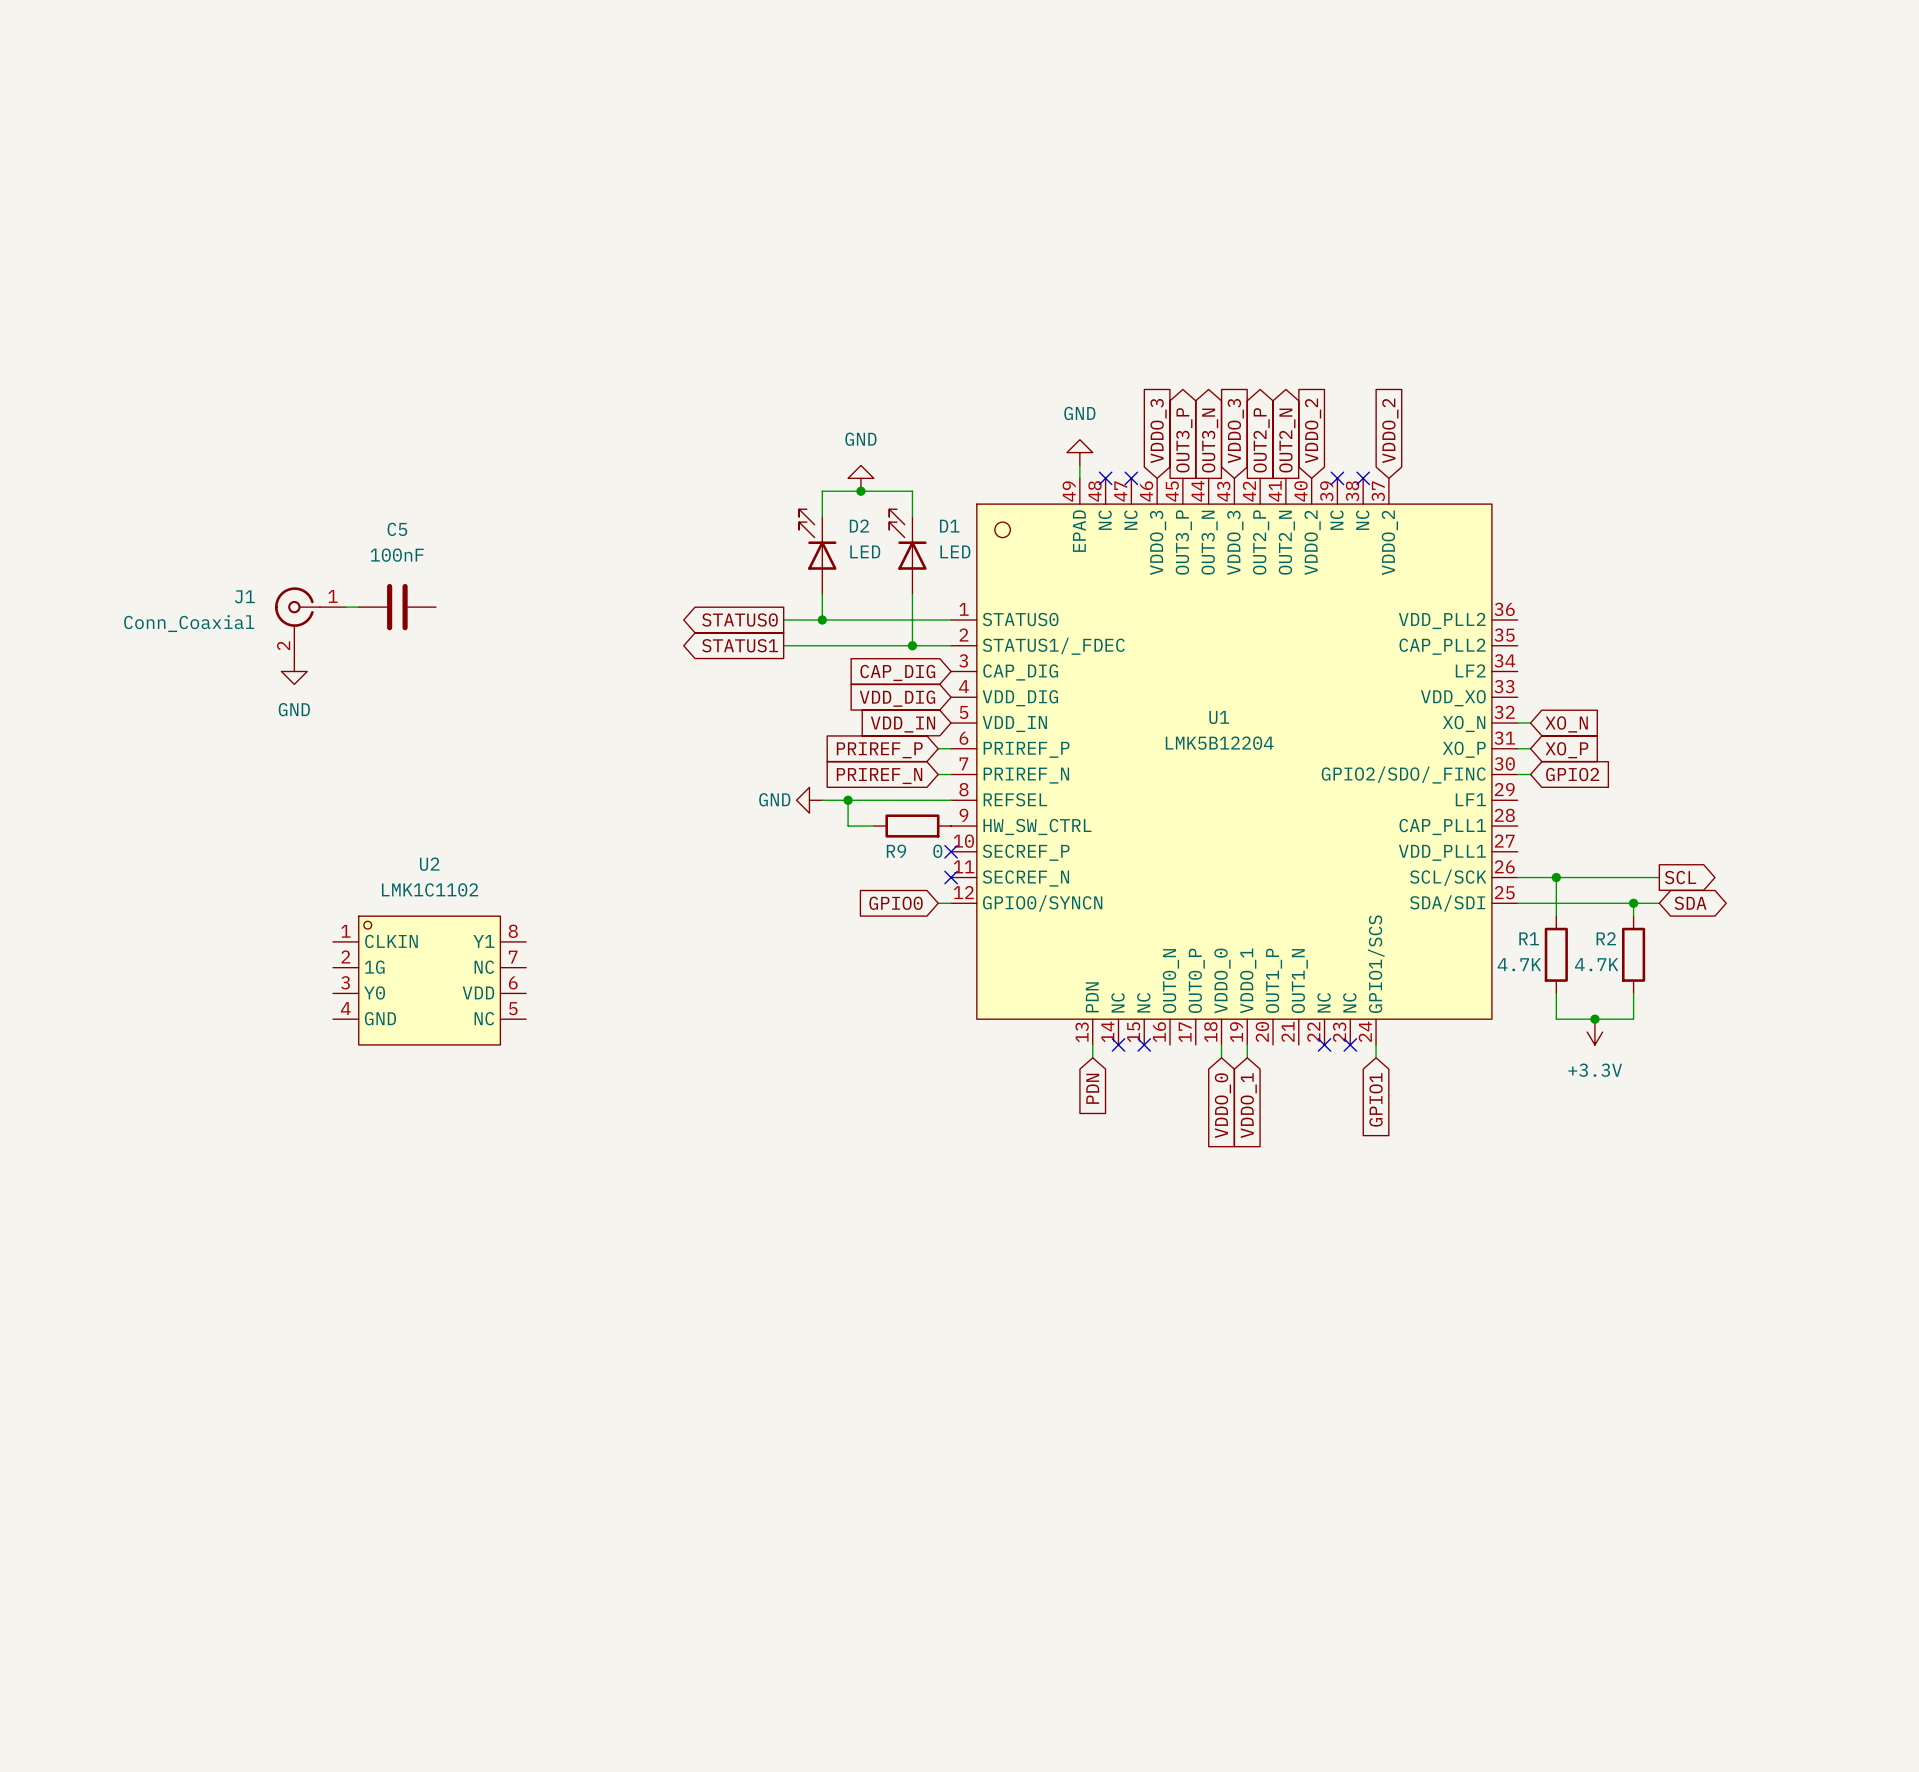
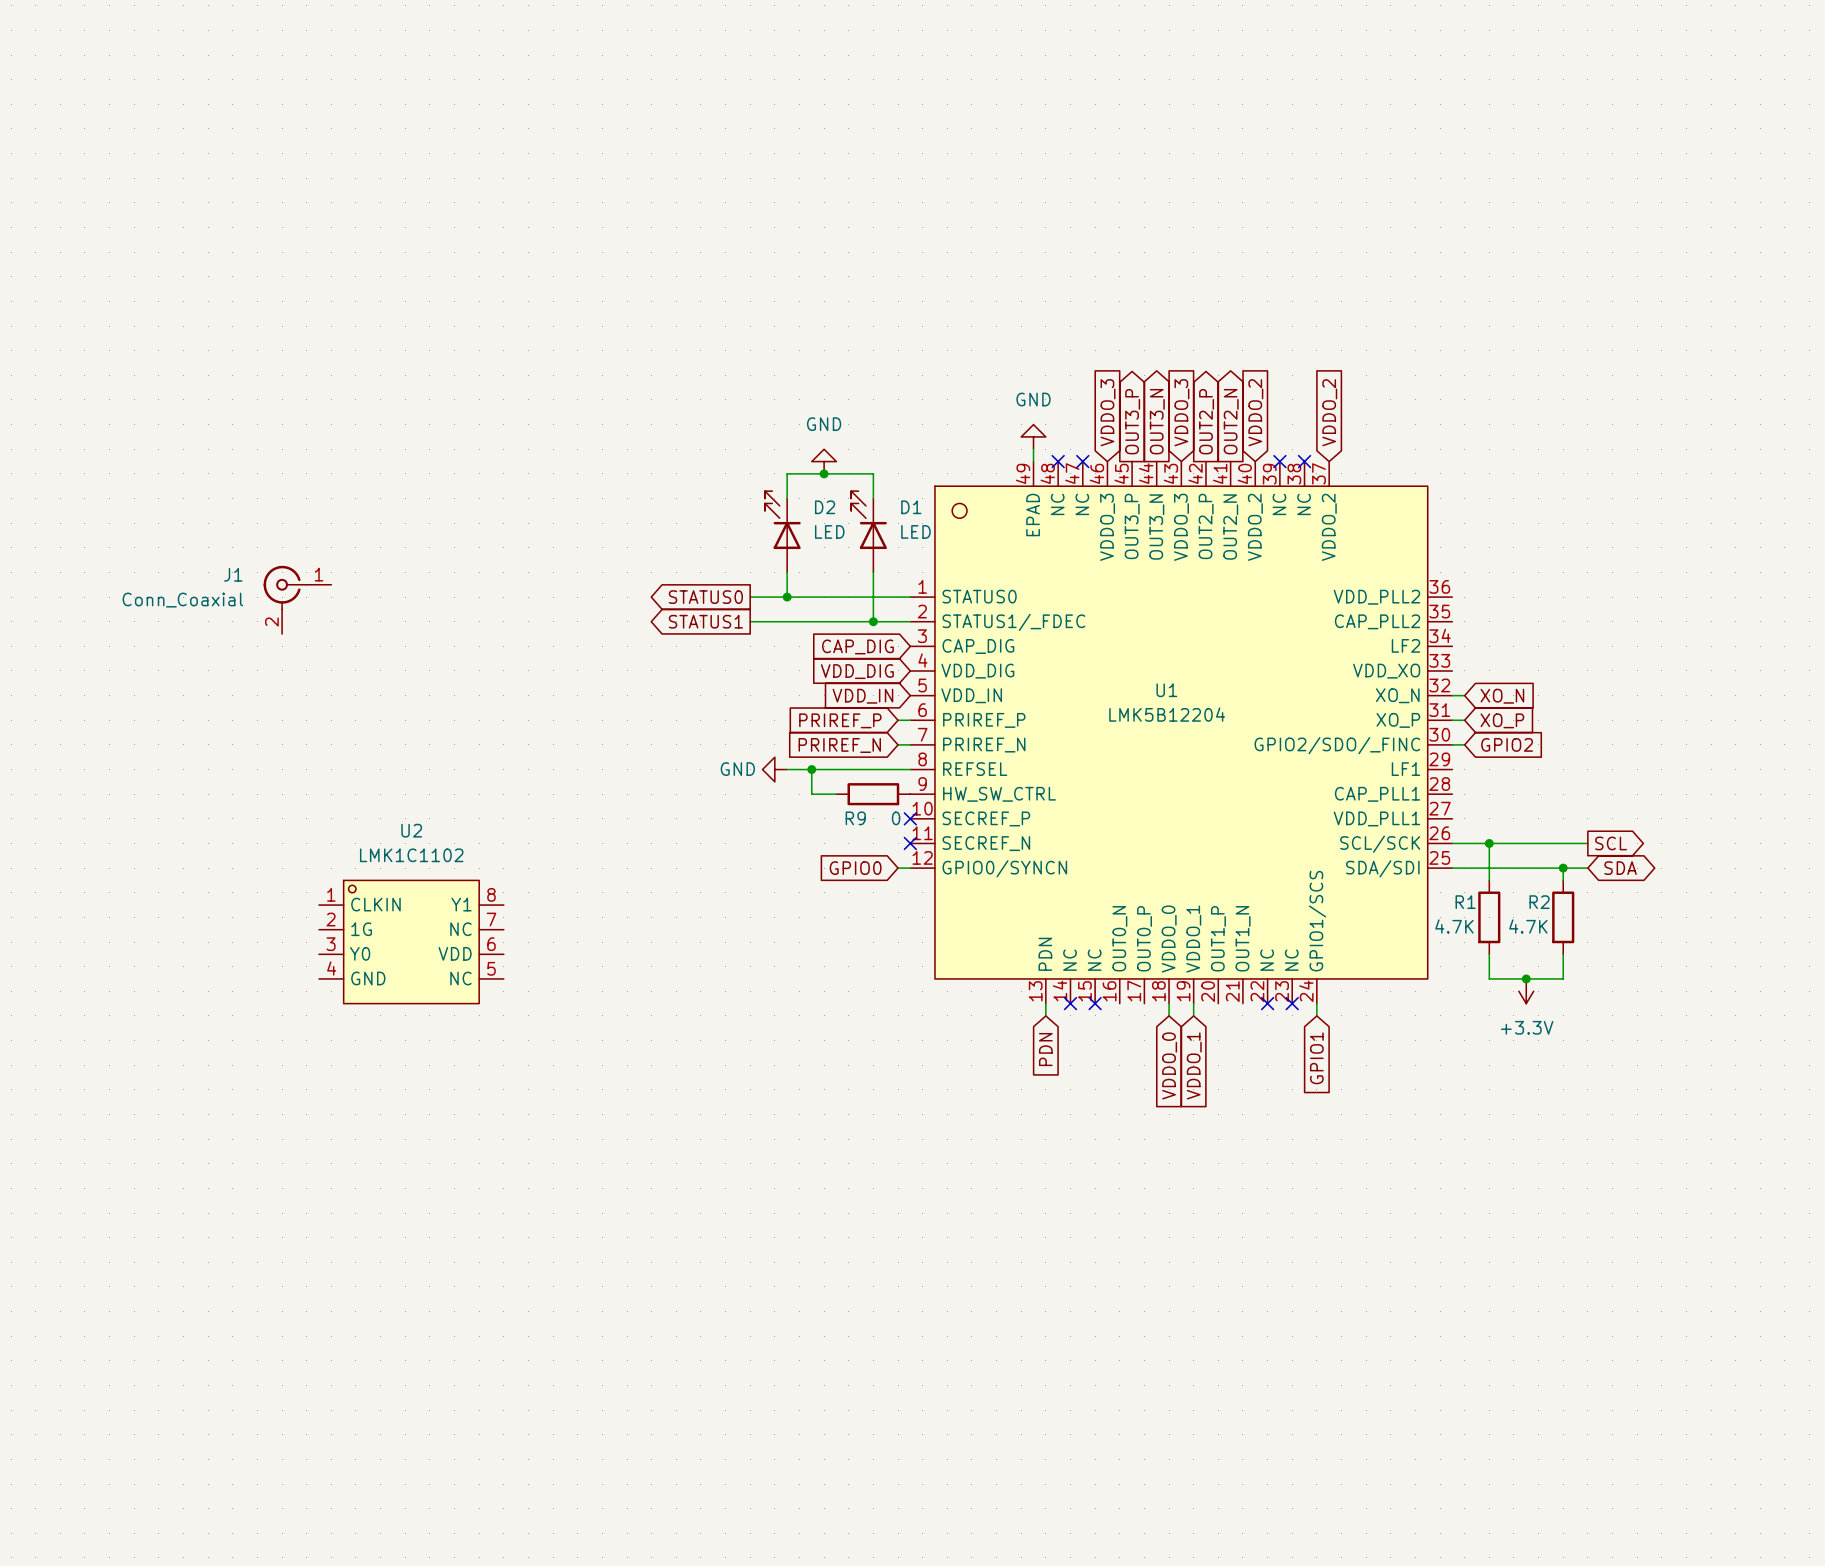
wire: (345, 607) (358, 607) -> none
C5: 100nF (397, 607) -> none
power symbol: GND (294, 671) -> none

